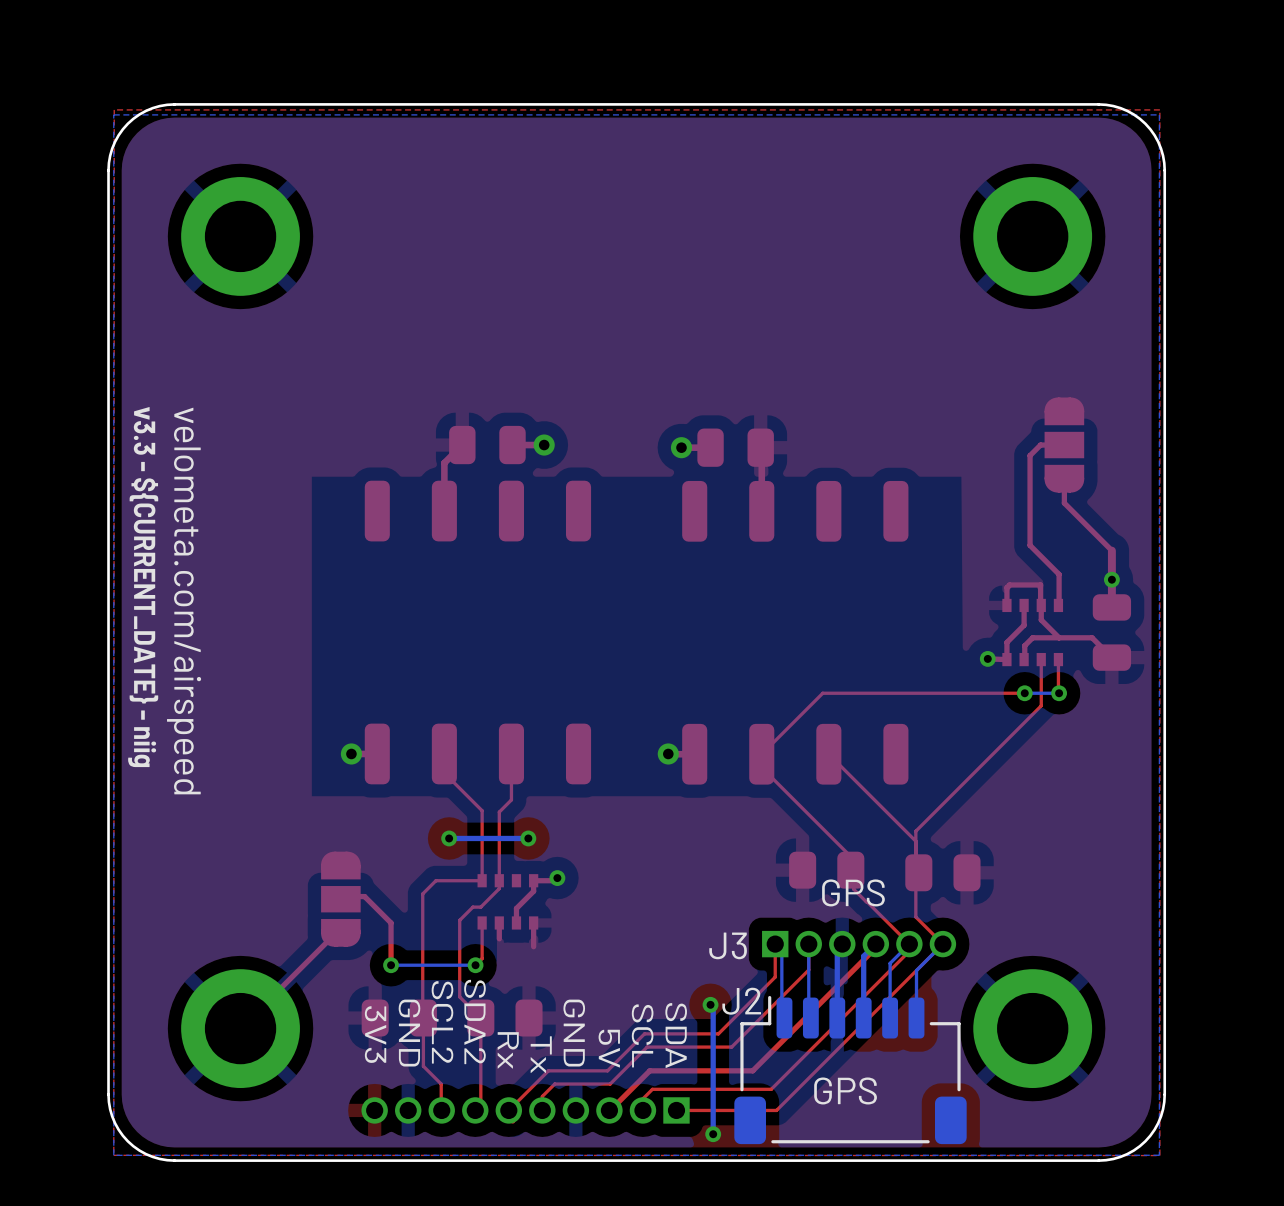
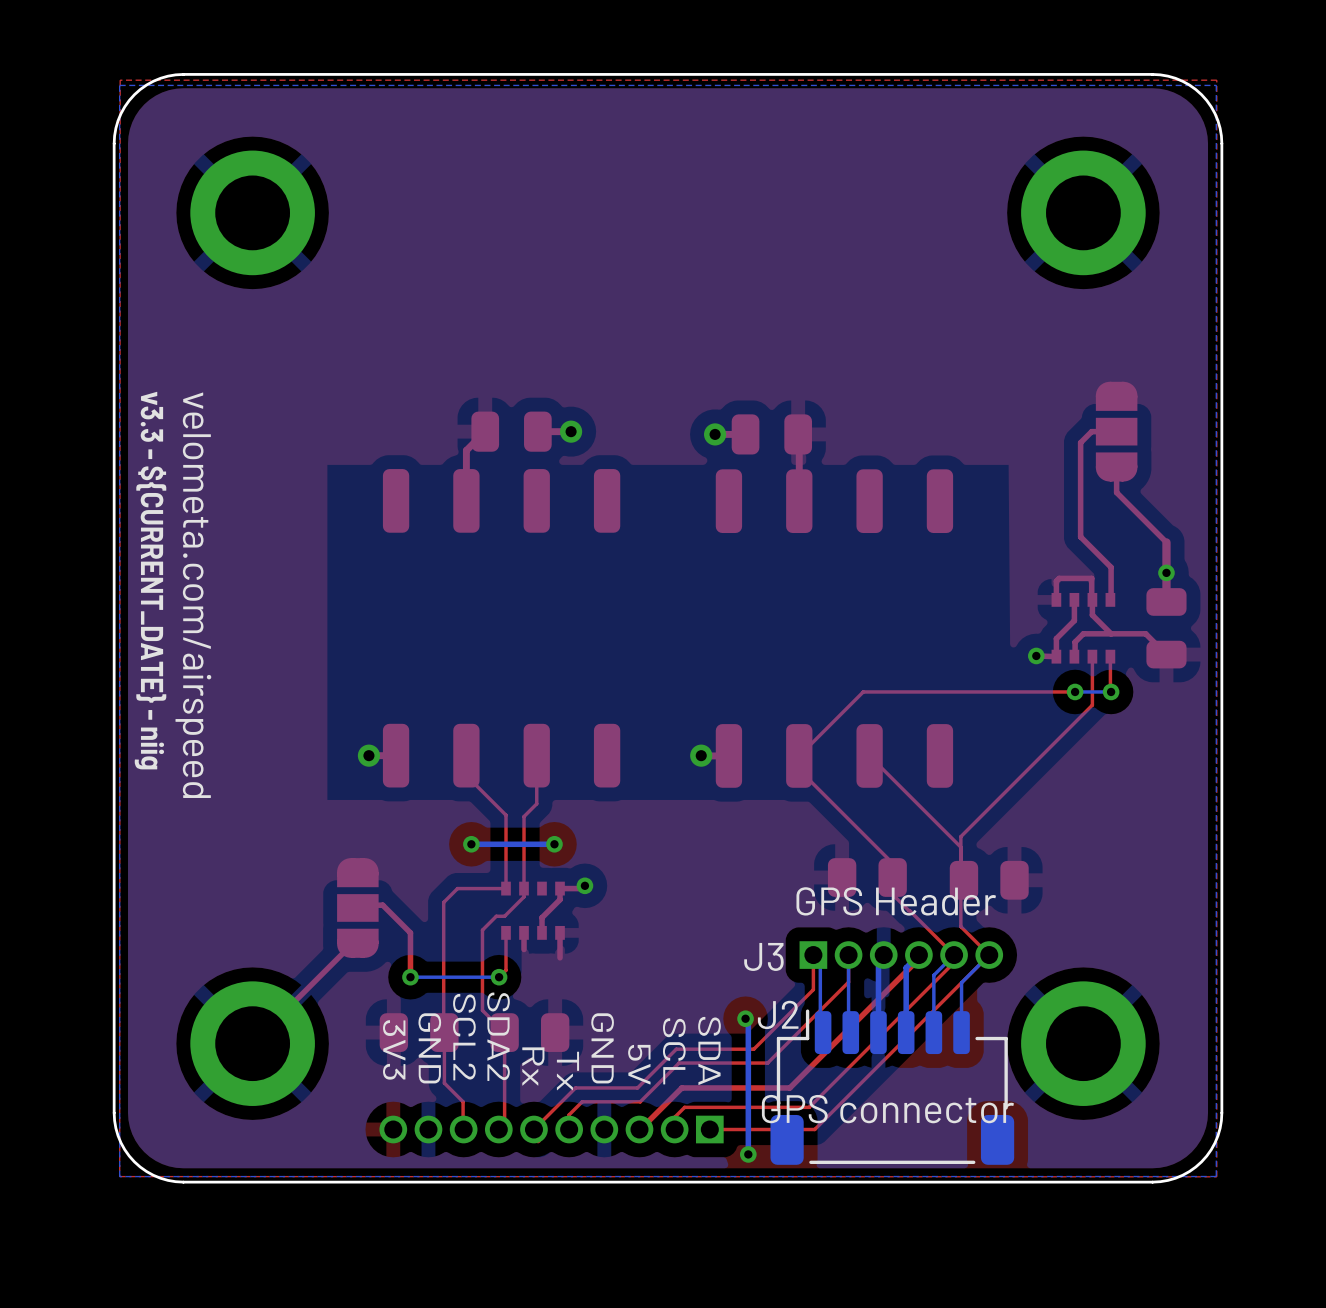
J3 value: GPS (853, 892) -> GPS Header (896, 901)
J2 value: GPS (845, 1090) -> GPS connector (887, 1109)

